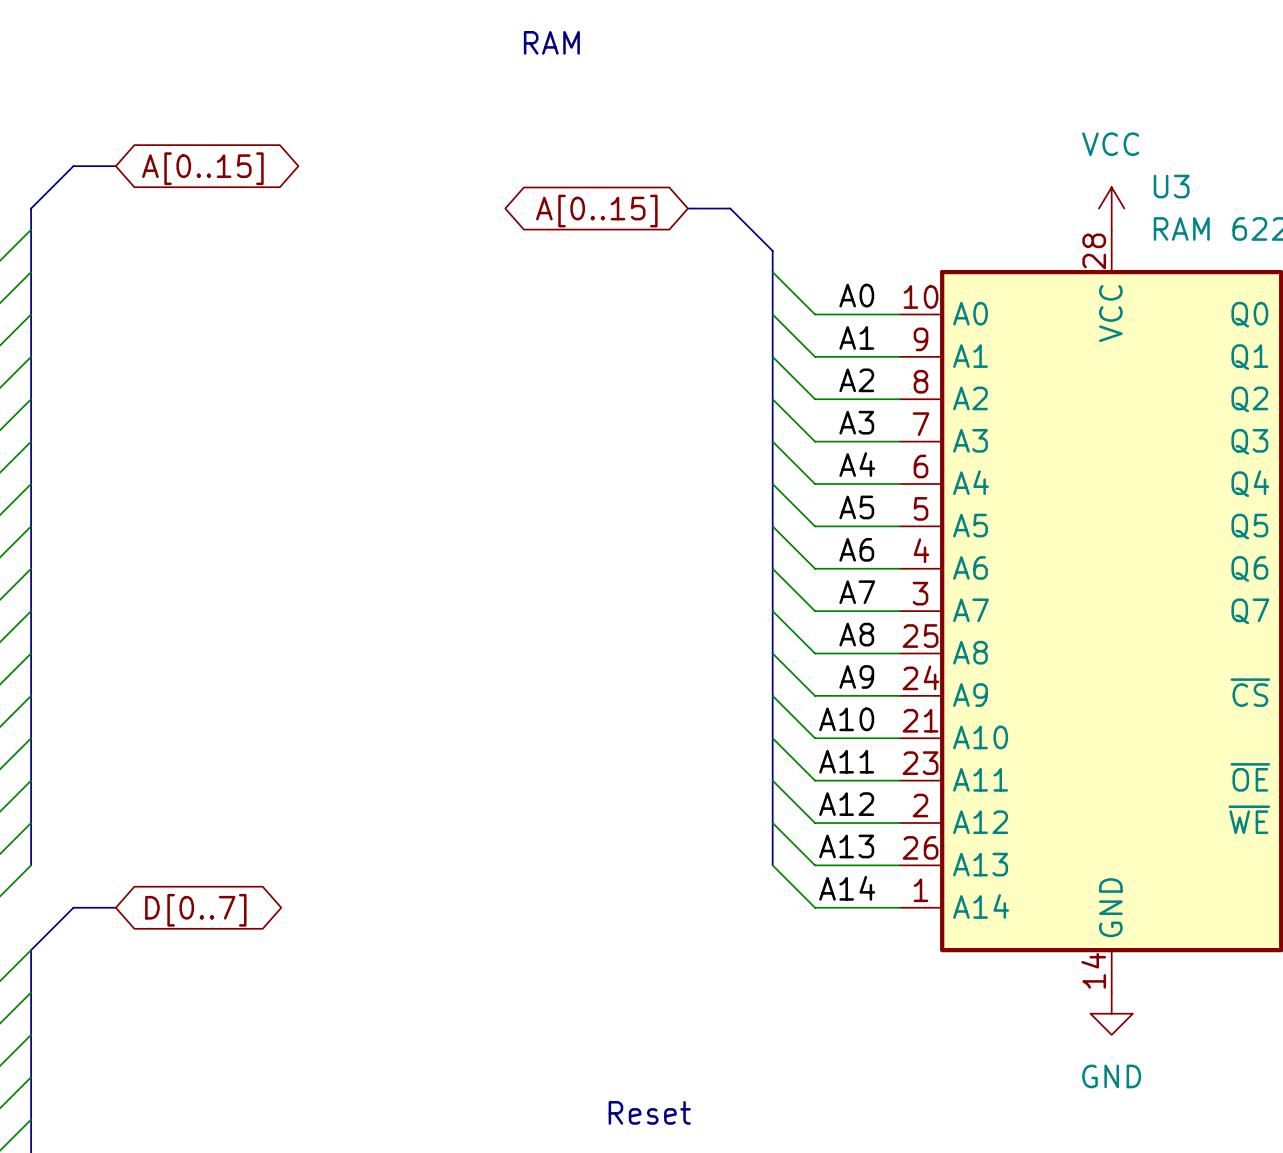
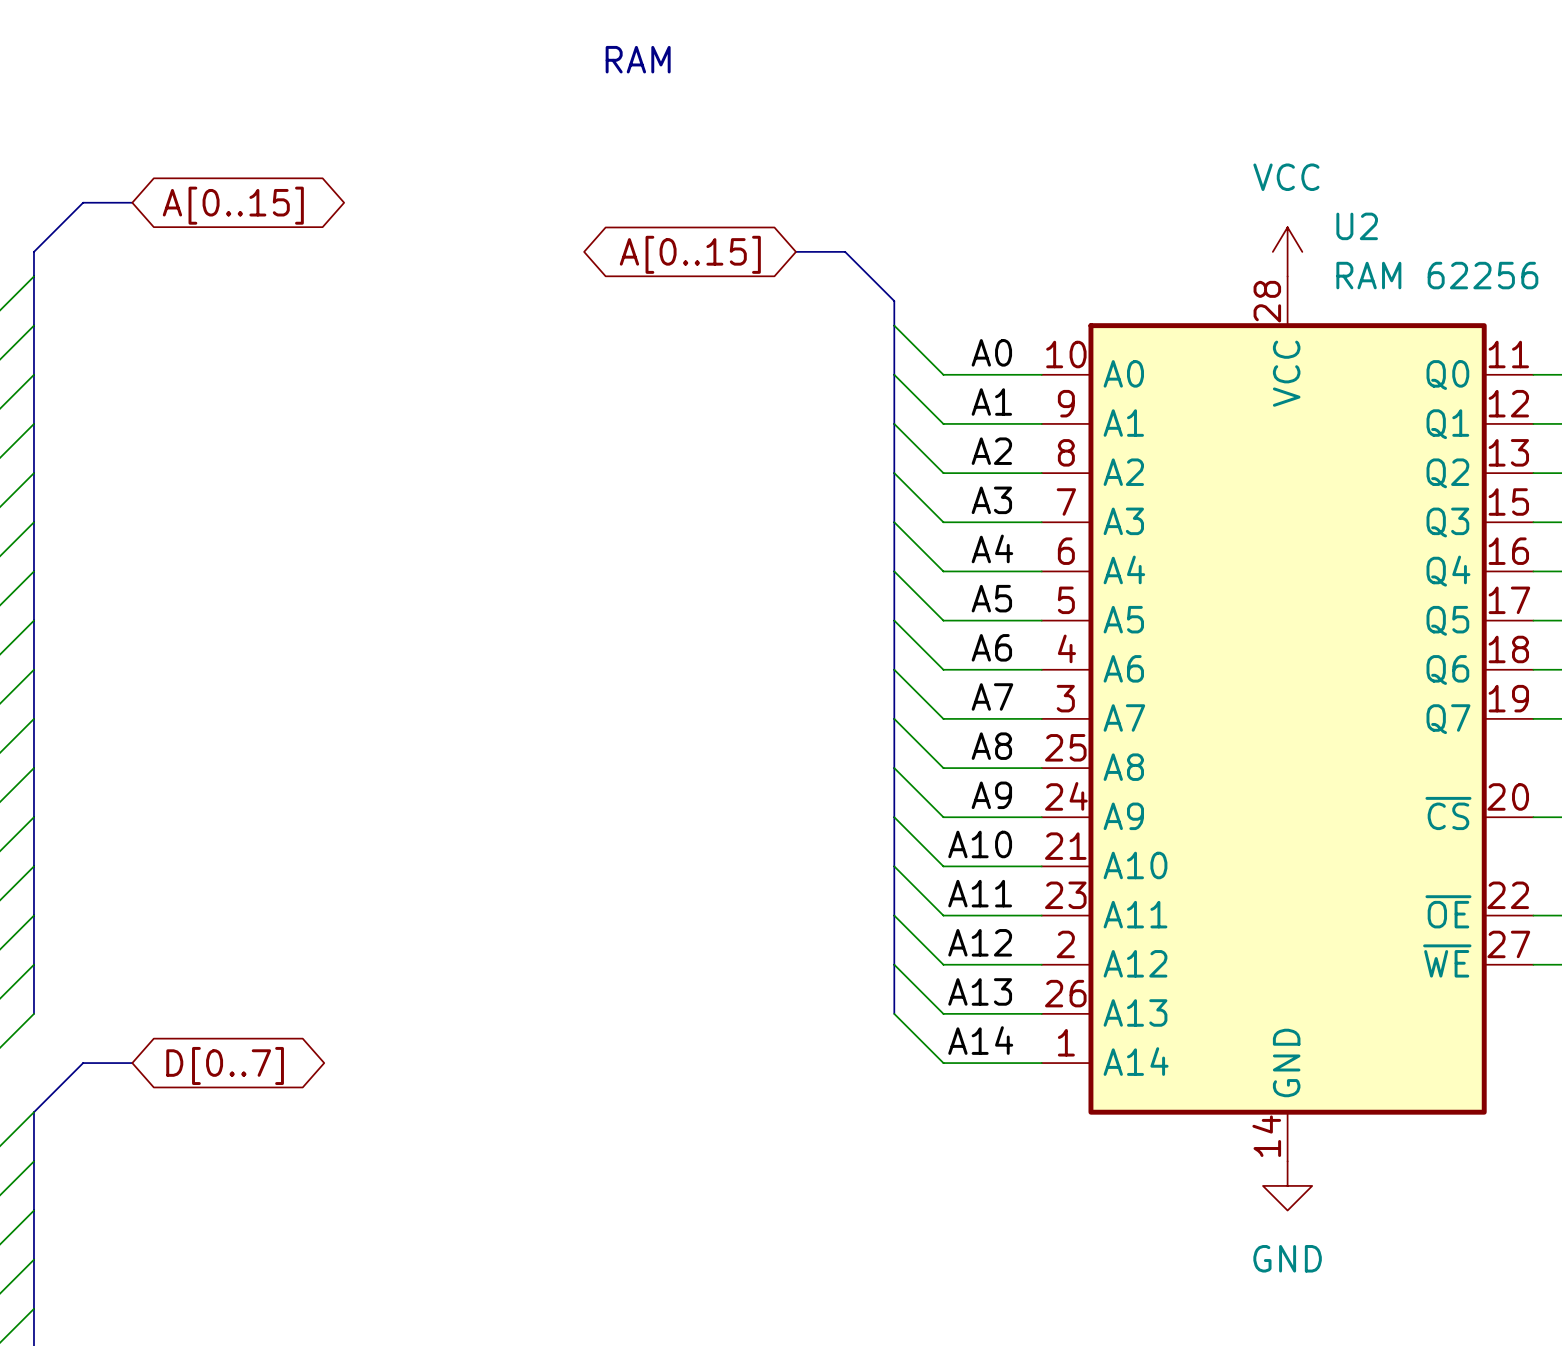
U3 name: U3 (1171, 186) -> U2 (1357, 226)
text: Reset (649, 1112) -> none

